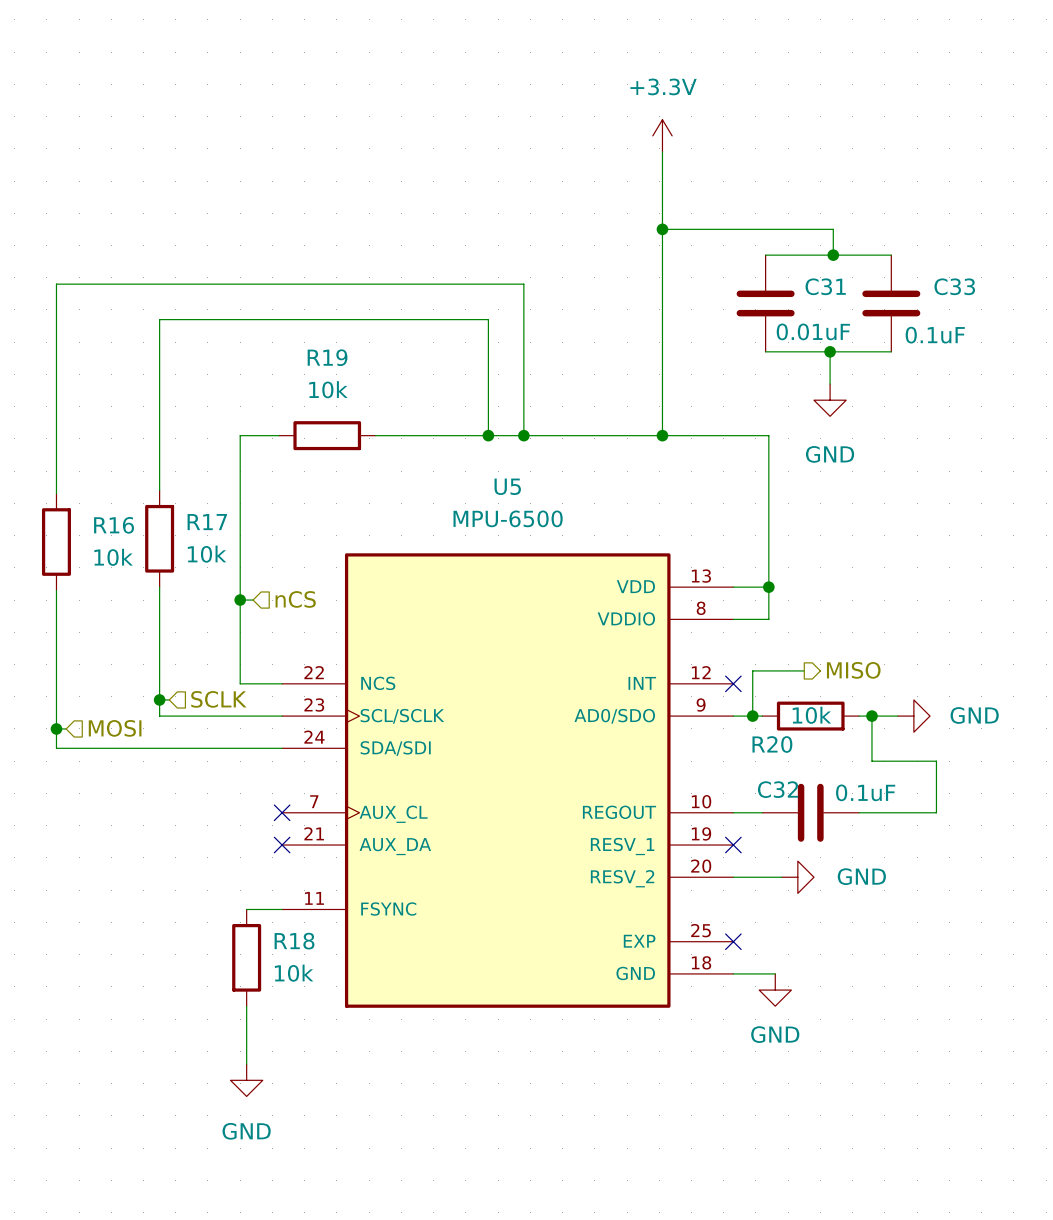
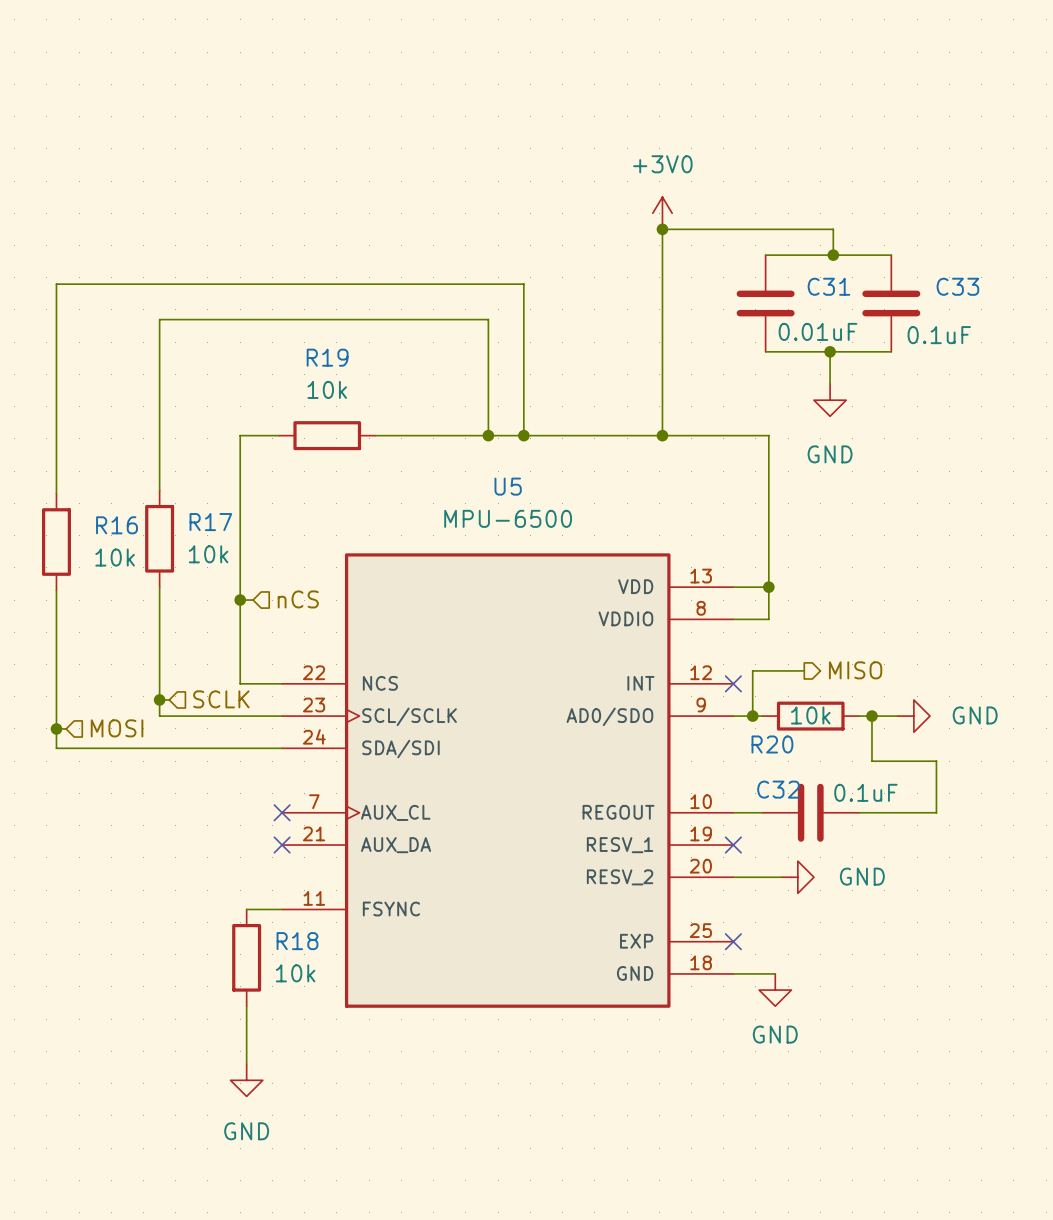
power symbol: +3.3V (662, 135) -> none
wire: (662, 151) (662, 229) -> none
power symbol: none -> +3V0 (662, 213)

